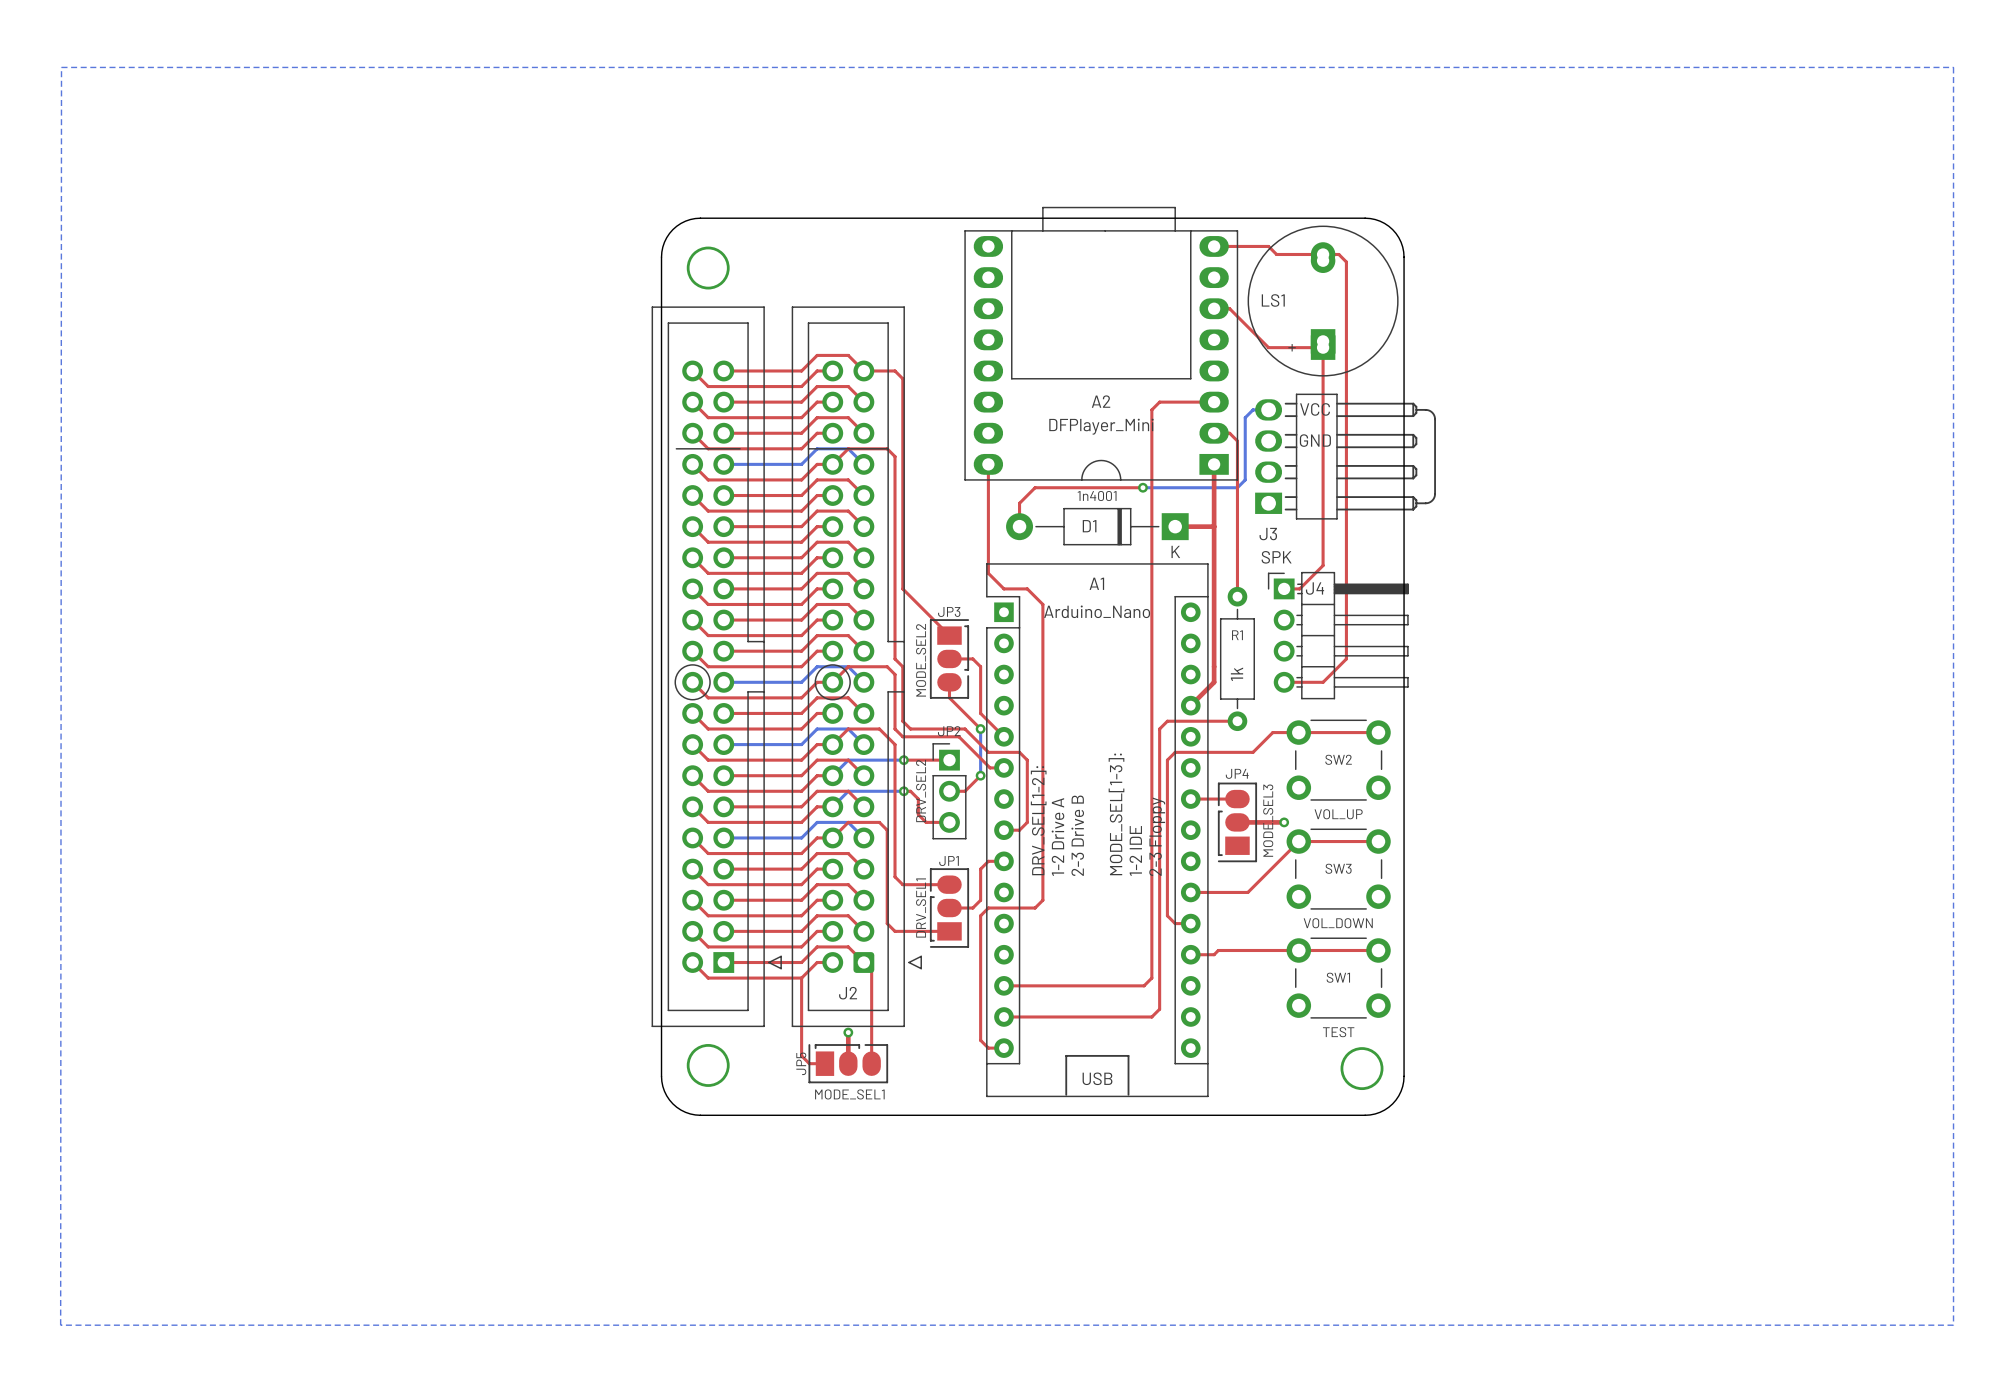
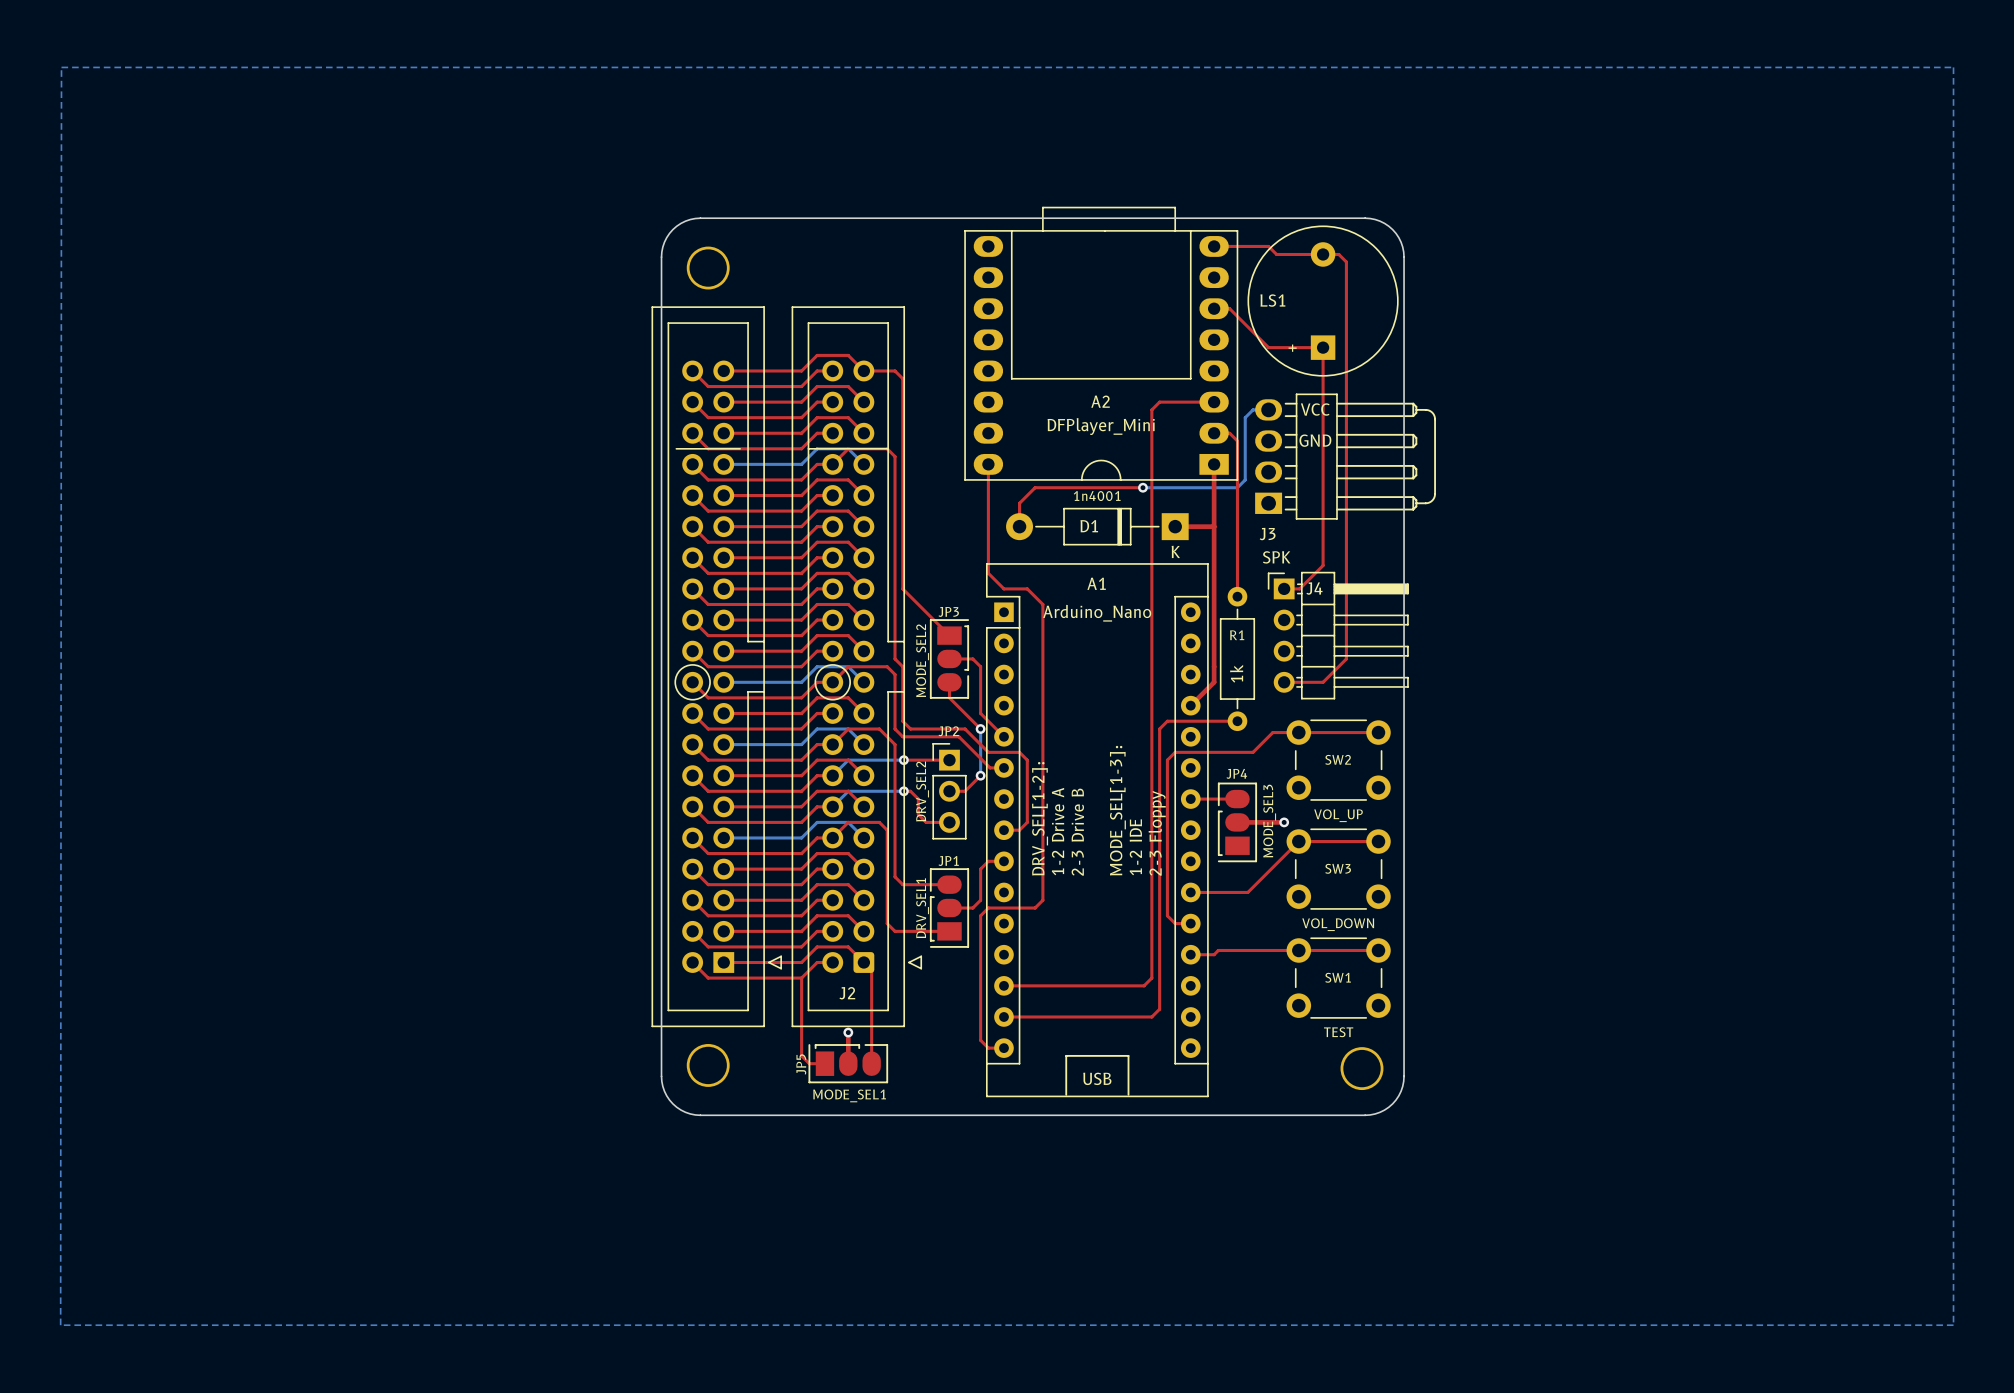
LS1 footprint: [1247, 225, 1399, 377] -> [1247, 225, 1399, 377]

